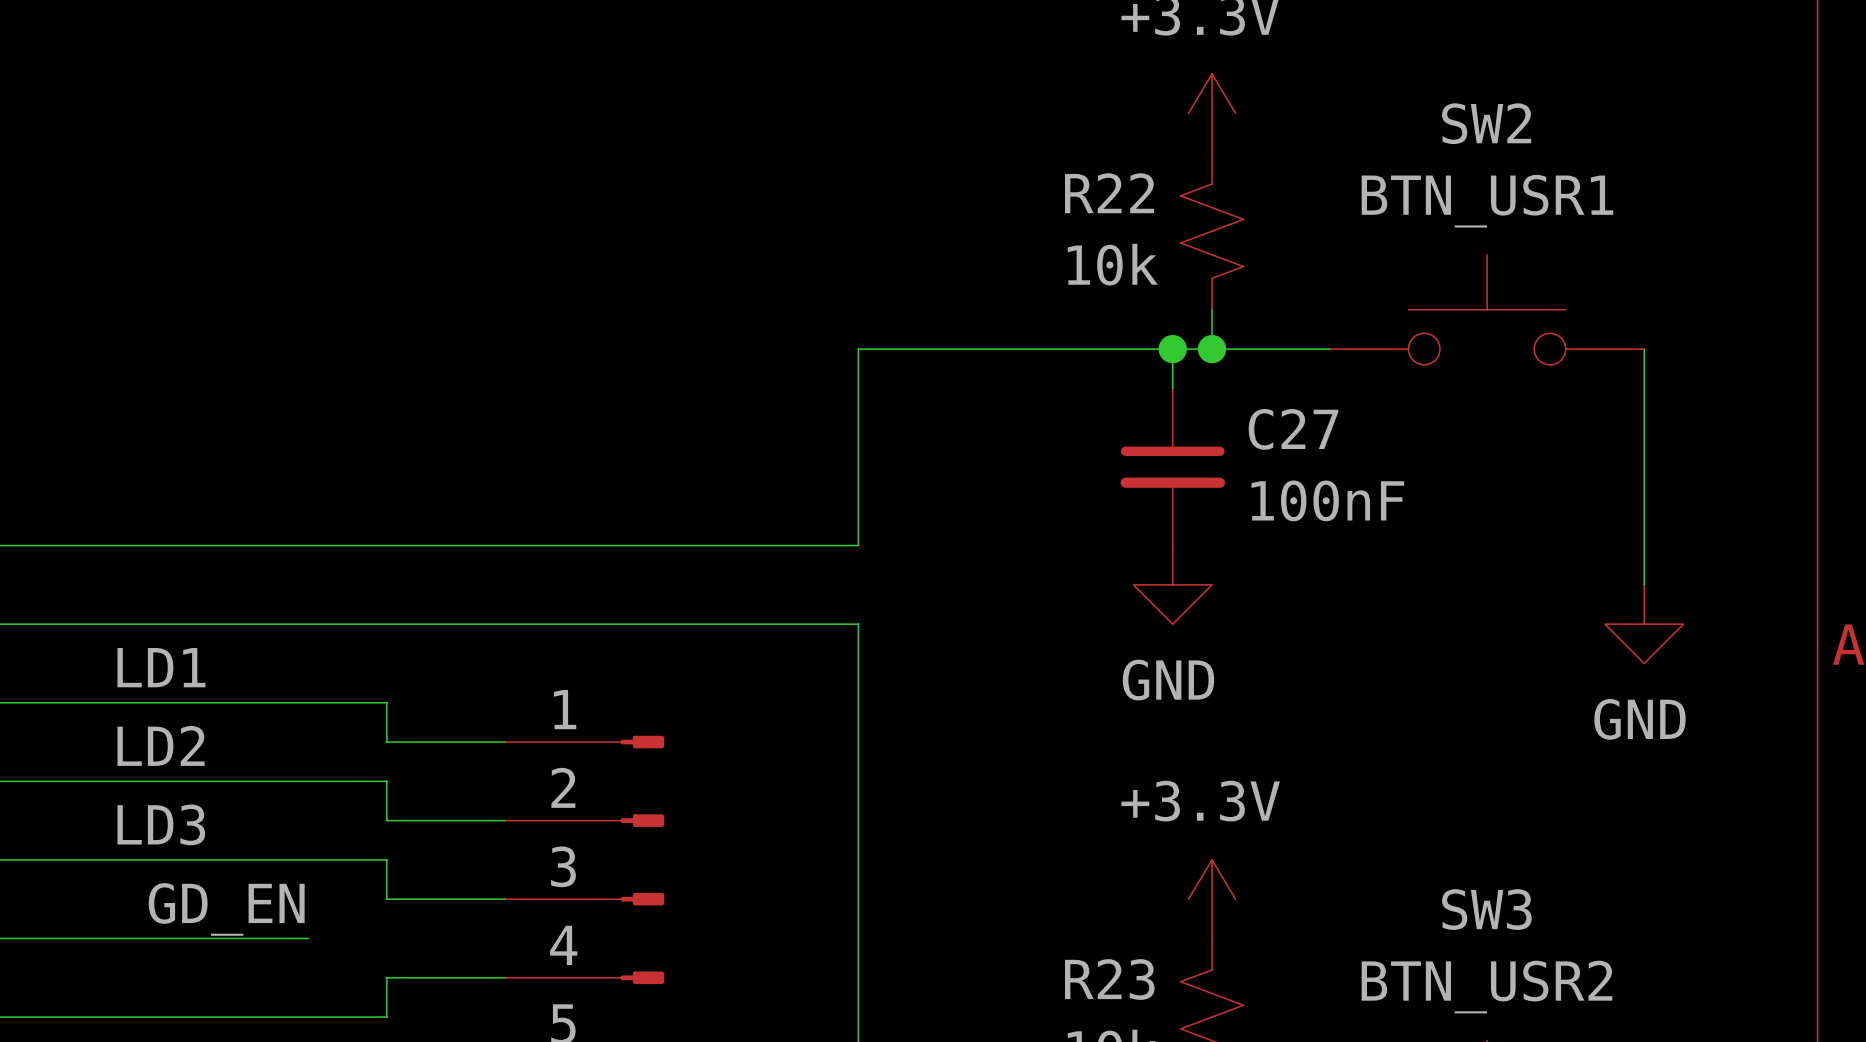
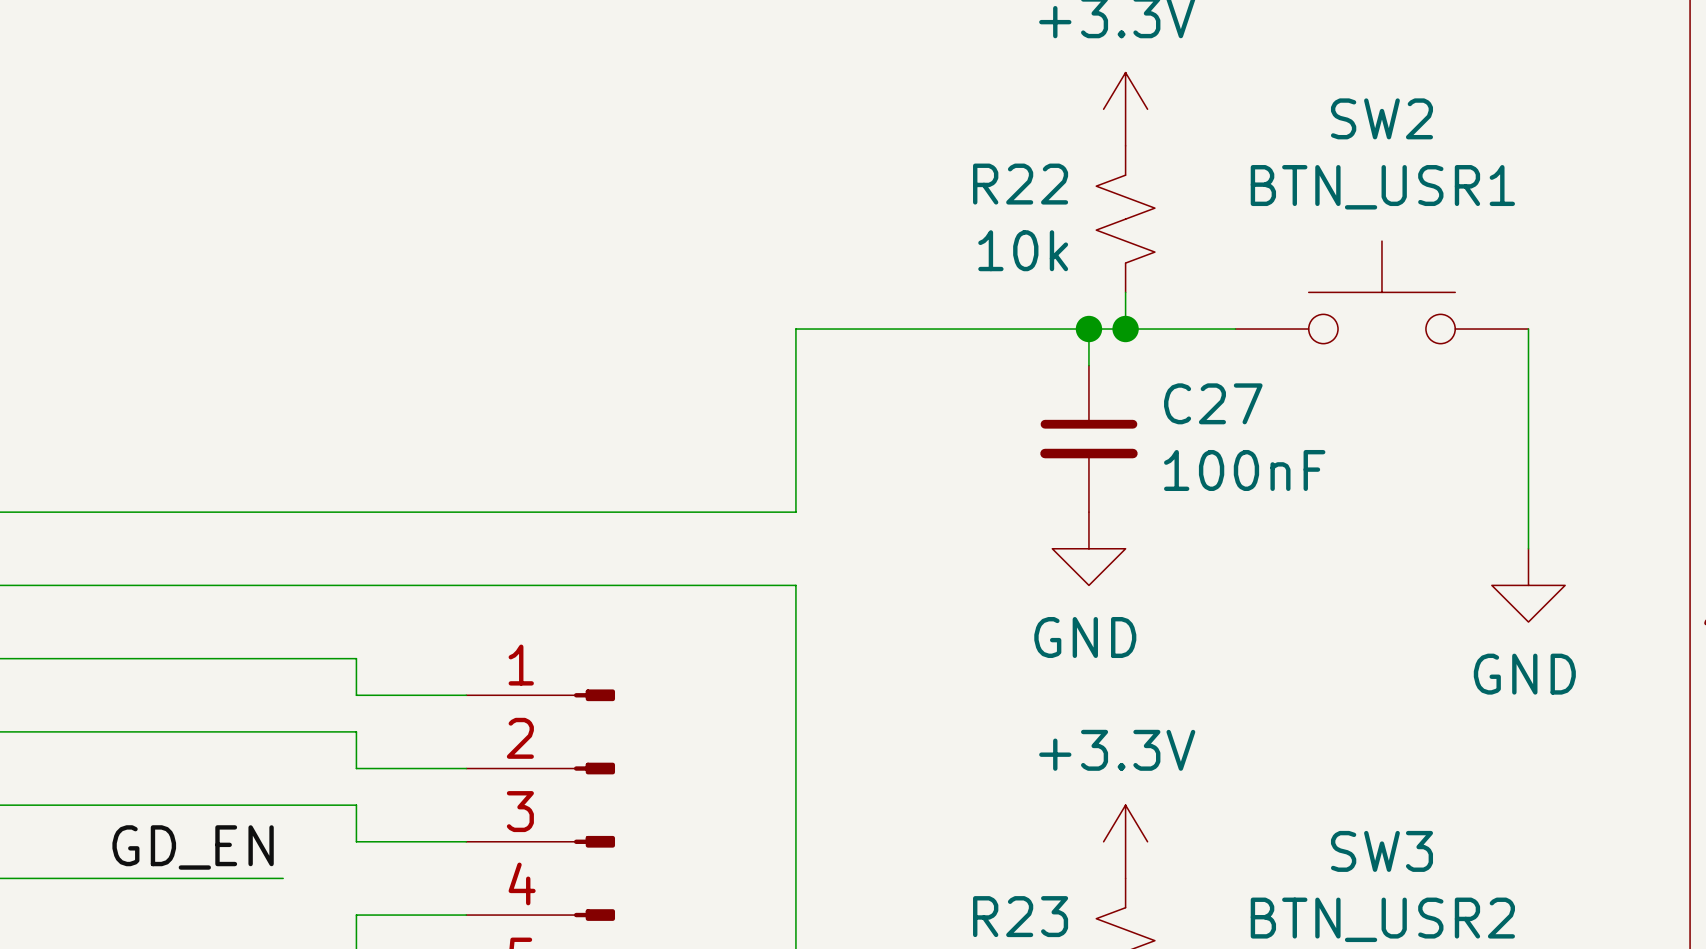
label: LD1 (161, 667) -> none
label: LD2 (161, 745) -> none
label: LD3 (161, 824) -> none

